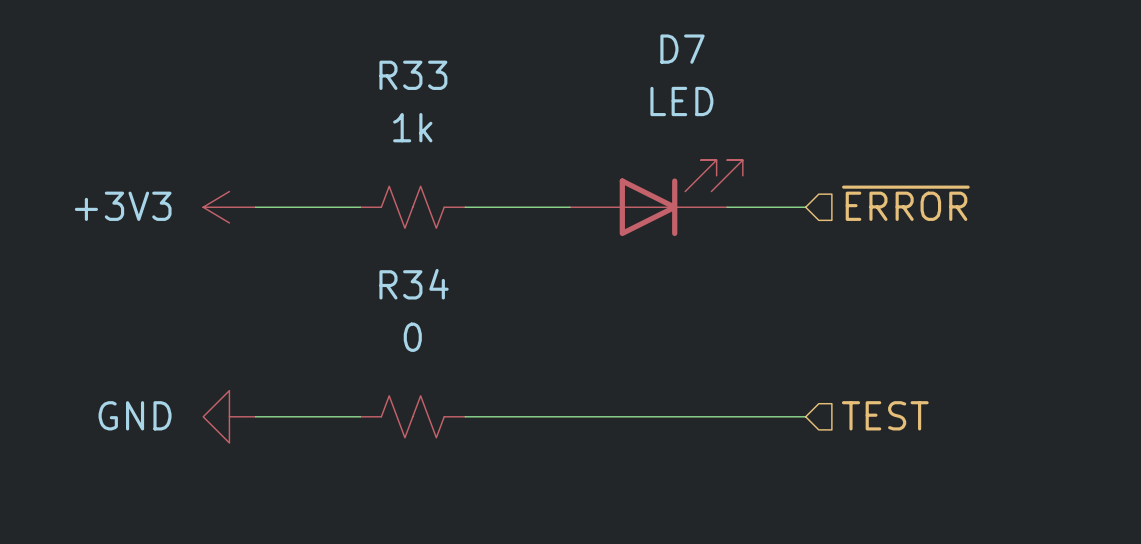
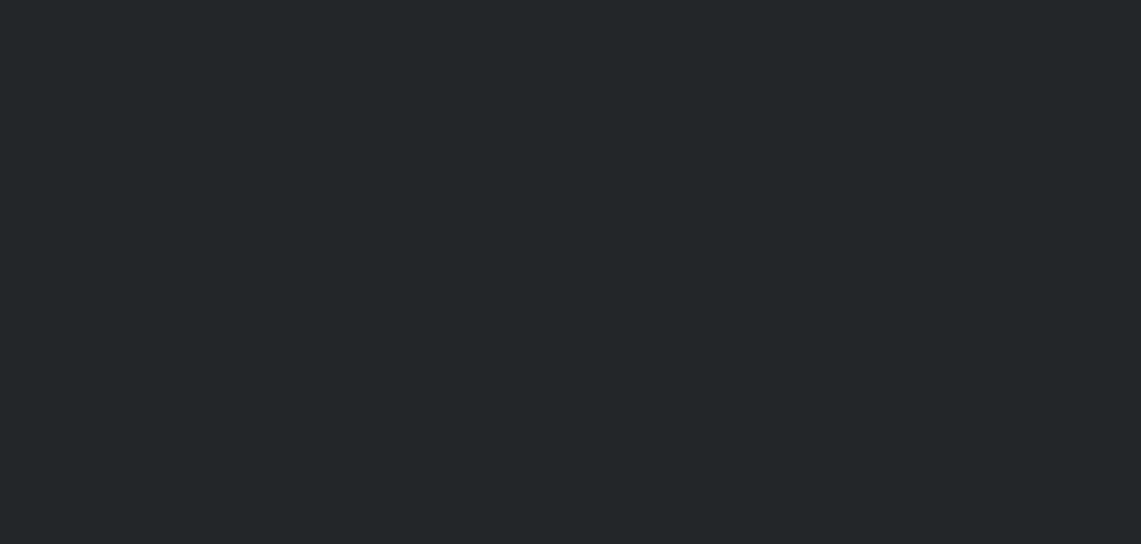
D7: LED (656, 198) -> none
hierarchical label: ~{ERROR} (905, 203) -> none
power symbol: +3V3 (229, 207) -> none
wire: (255, 207) (360, 207) -> none
R33: 1k (412, 207) -> none
wire: (465, 207) (569, 207) -> none
wire: (727, 207) (805, 207) -> none
hierarchical label: TEST (885, 415) -> none
power symbol: GND (229, 416) -> none
wire: (255, 416) (360, 416) -> none
R34: 0 (412, 416) -> none
wire: (465, 416) (805, 416) -> none

